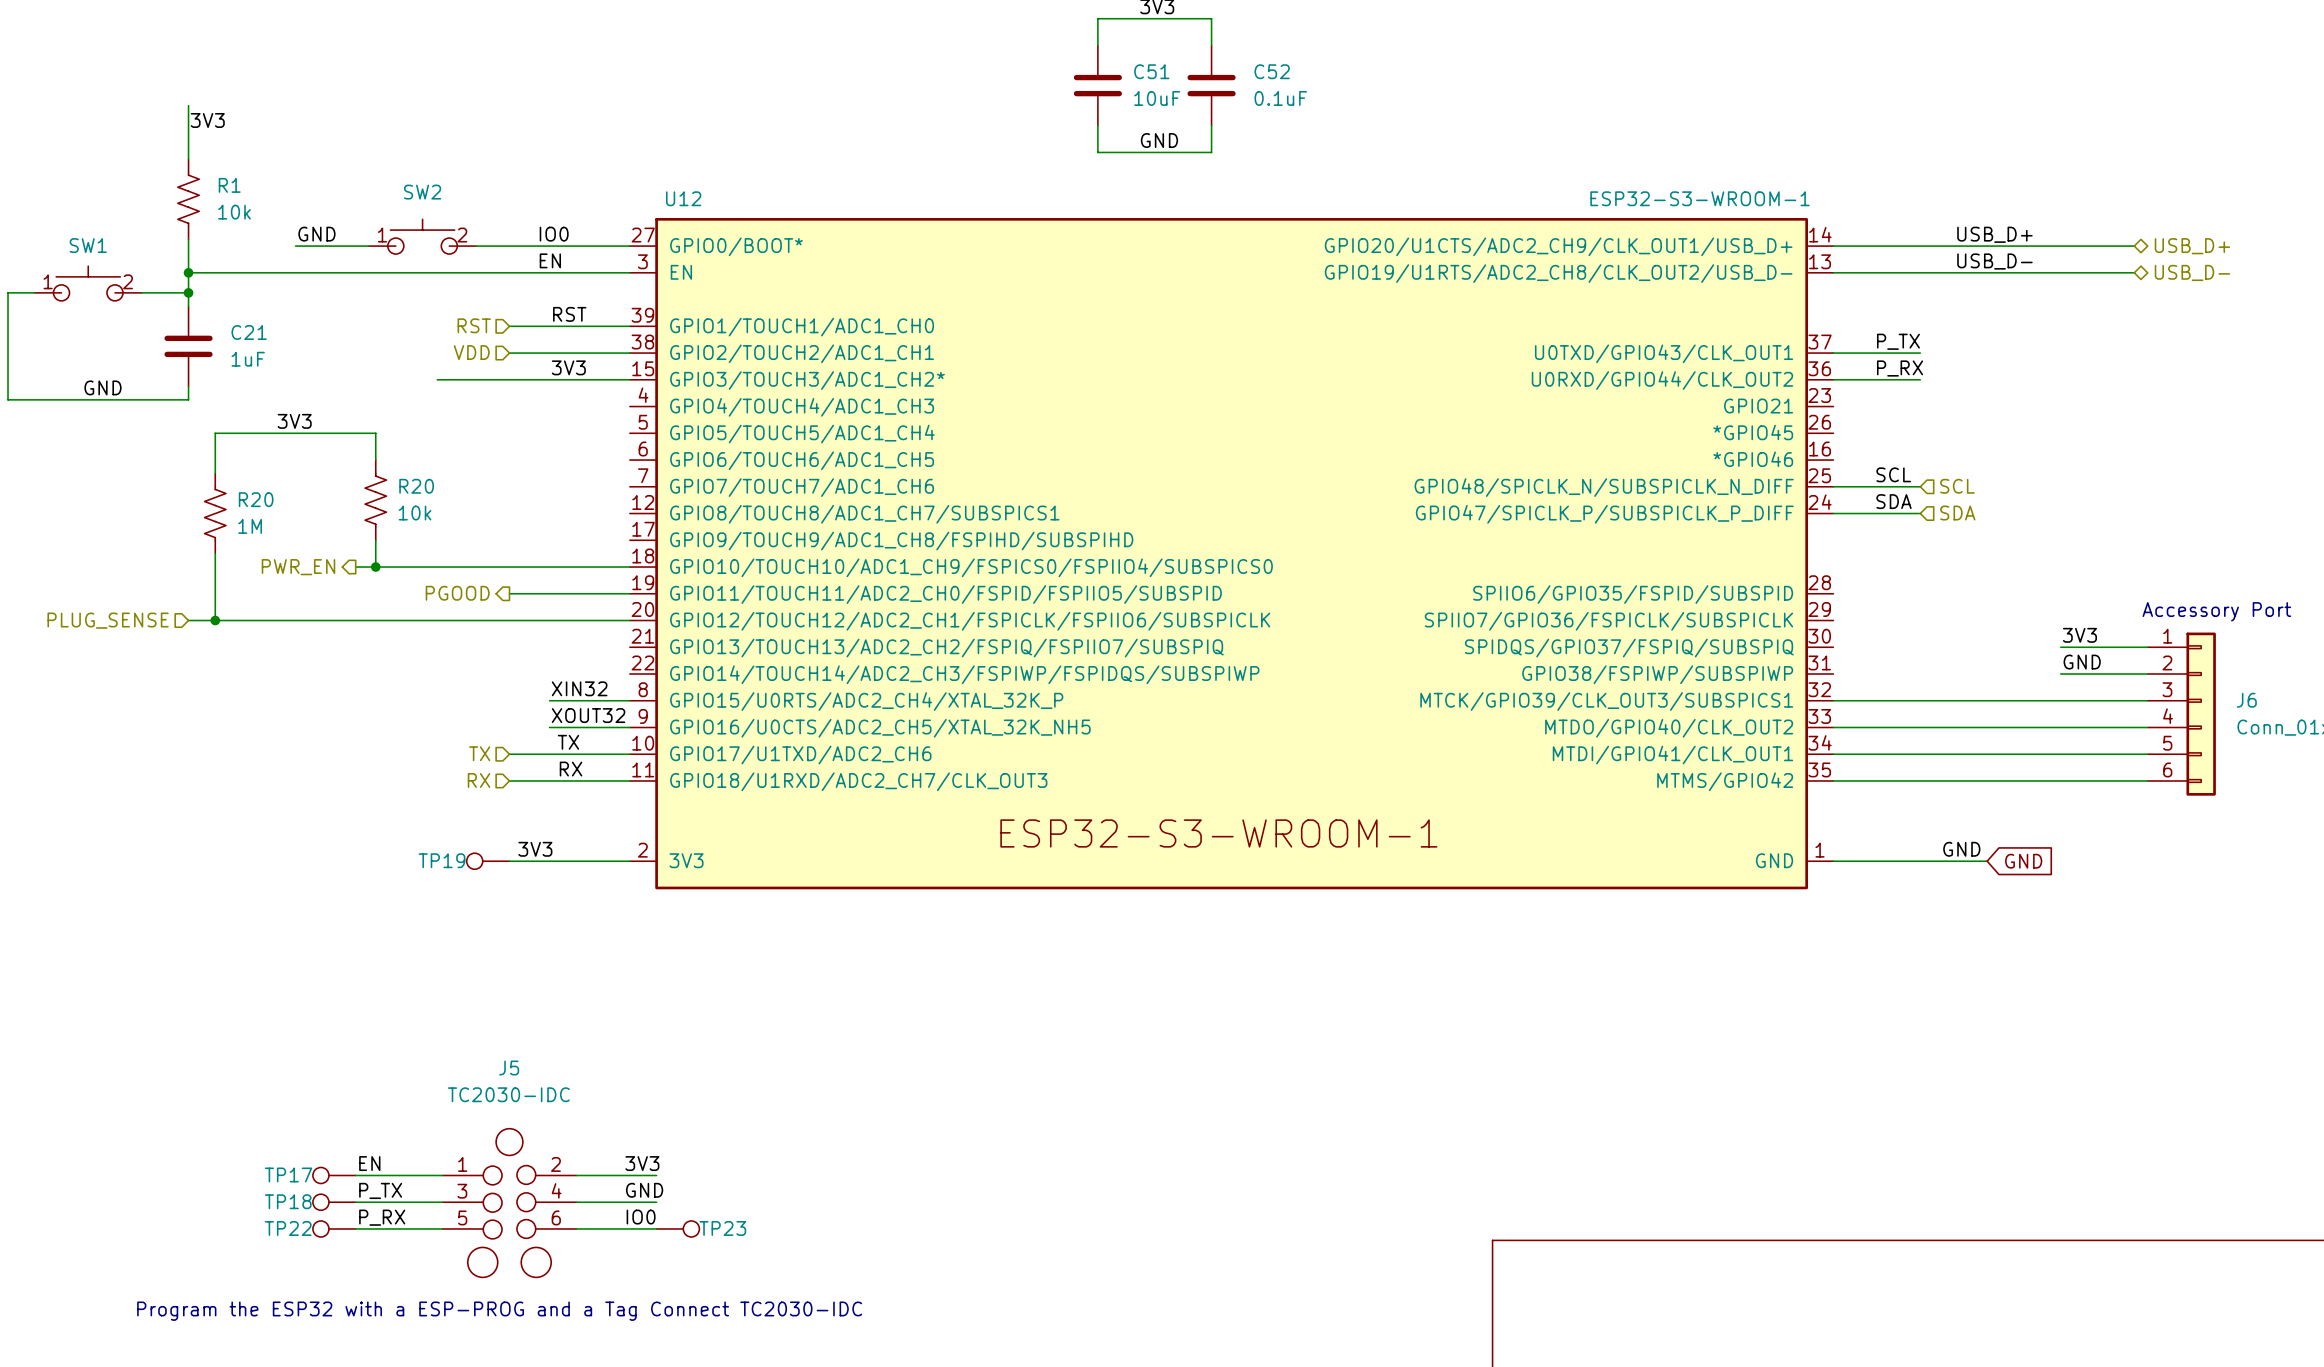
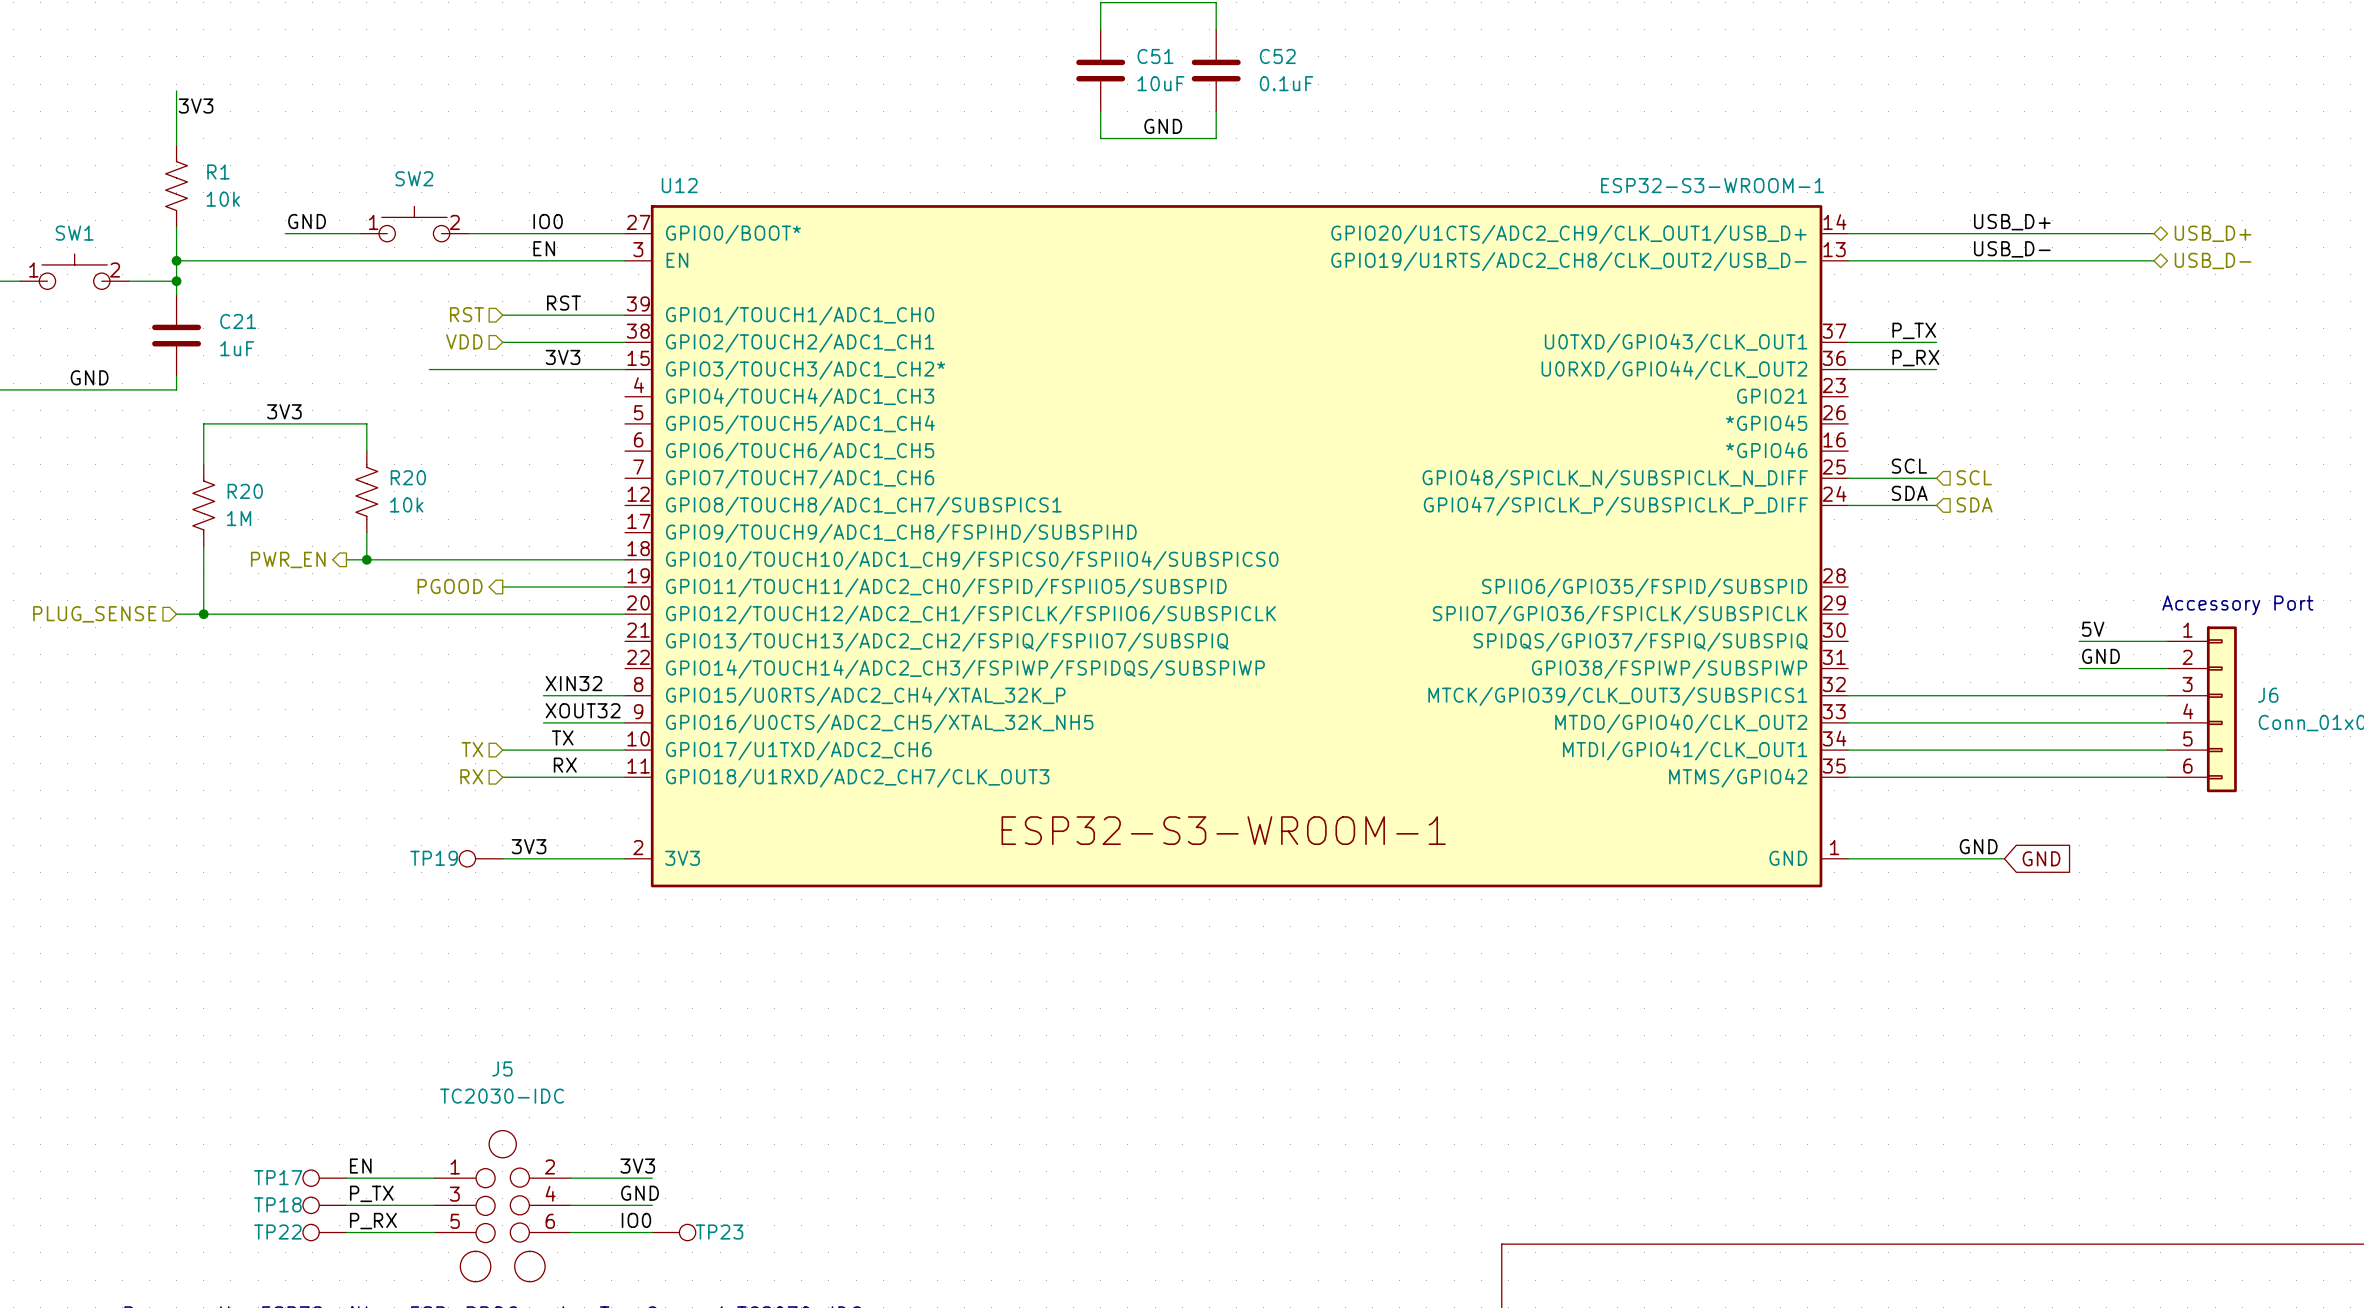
label: 3V3 (2079, 635) -> 5V (2093, 629)

